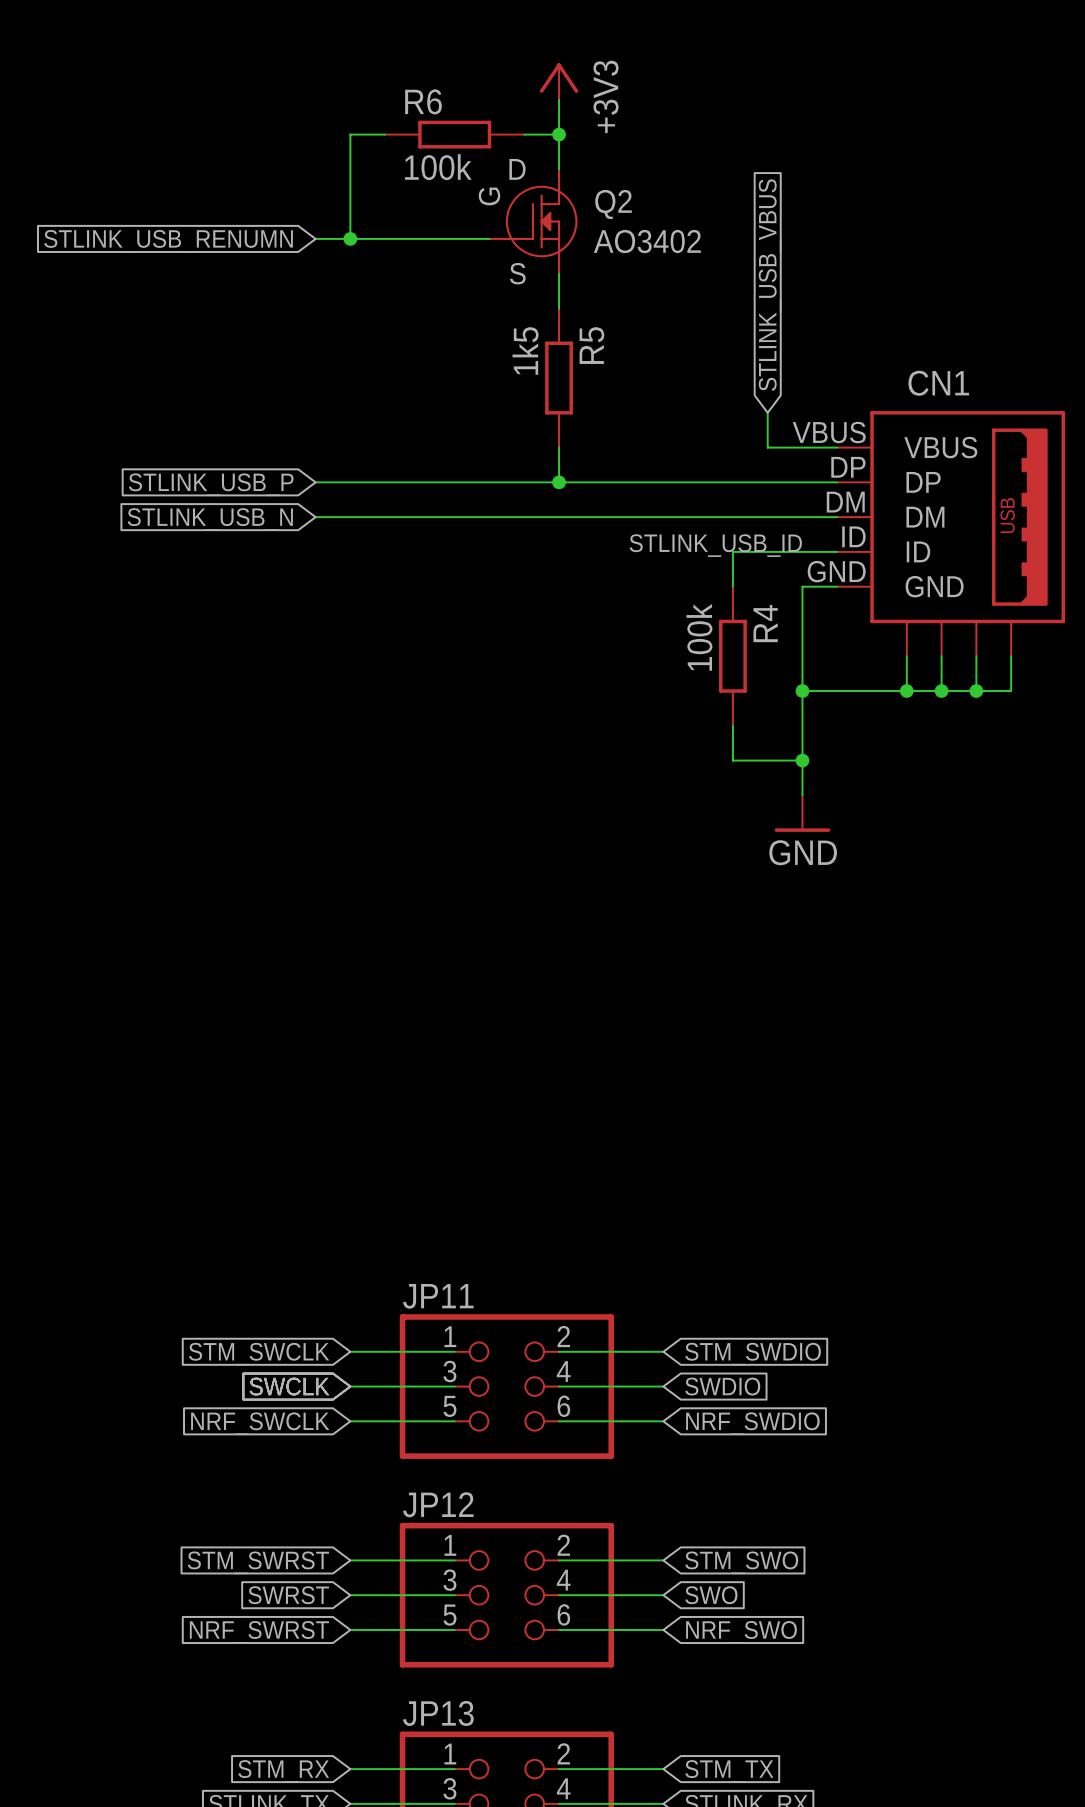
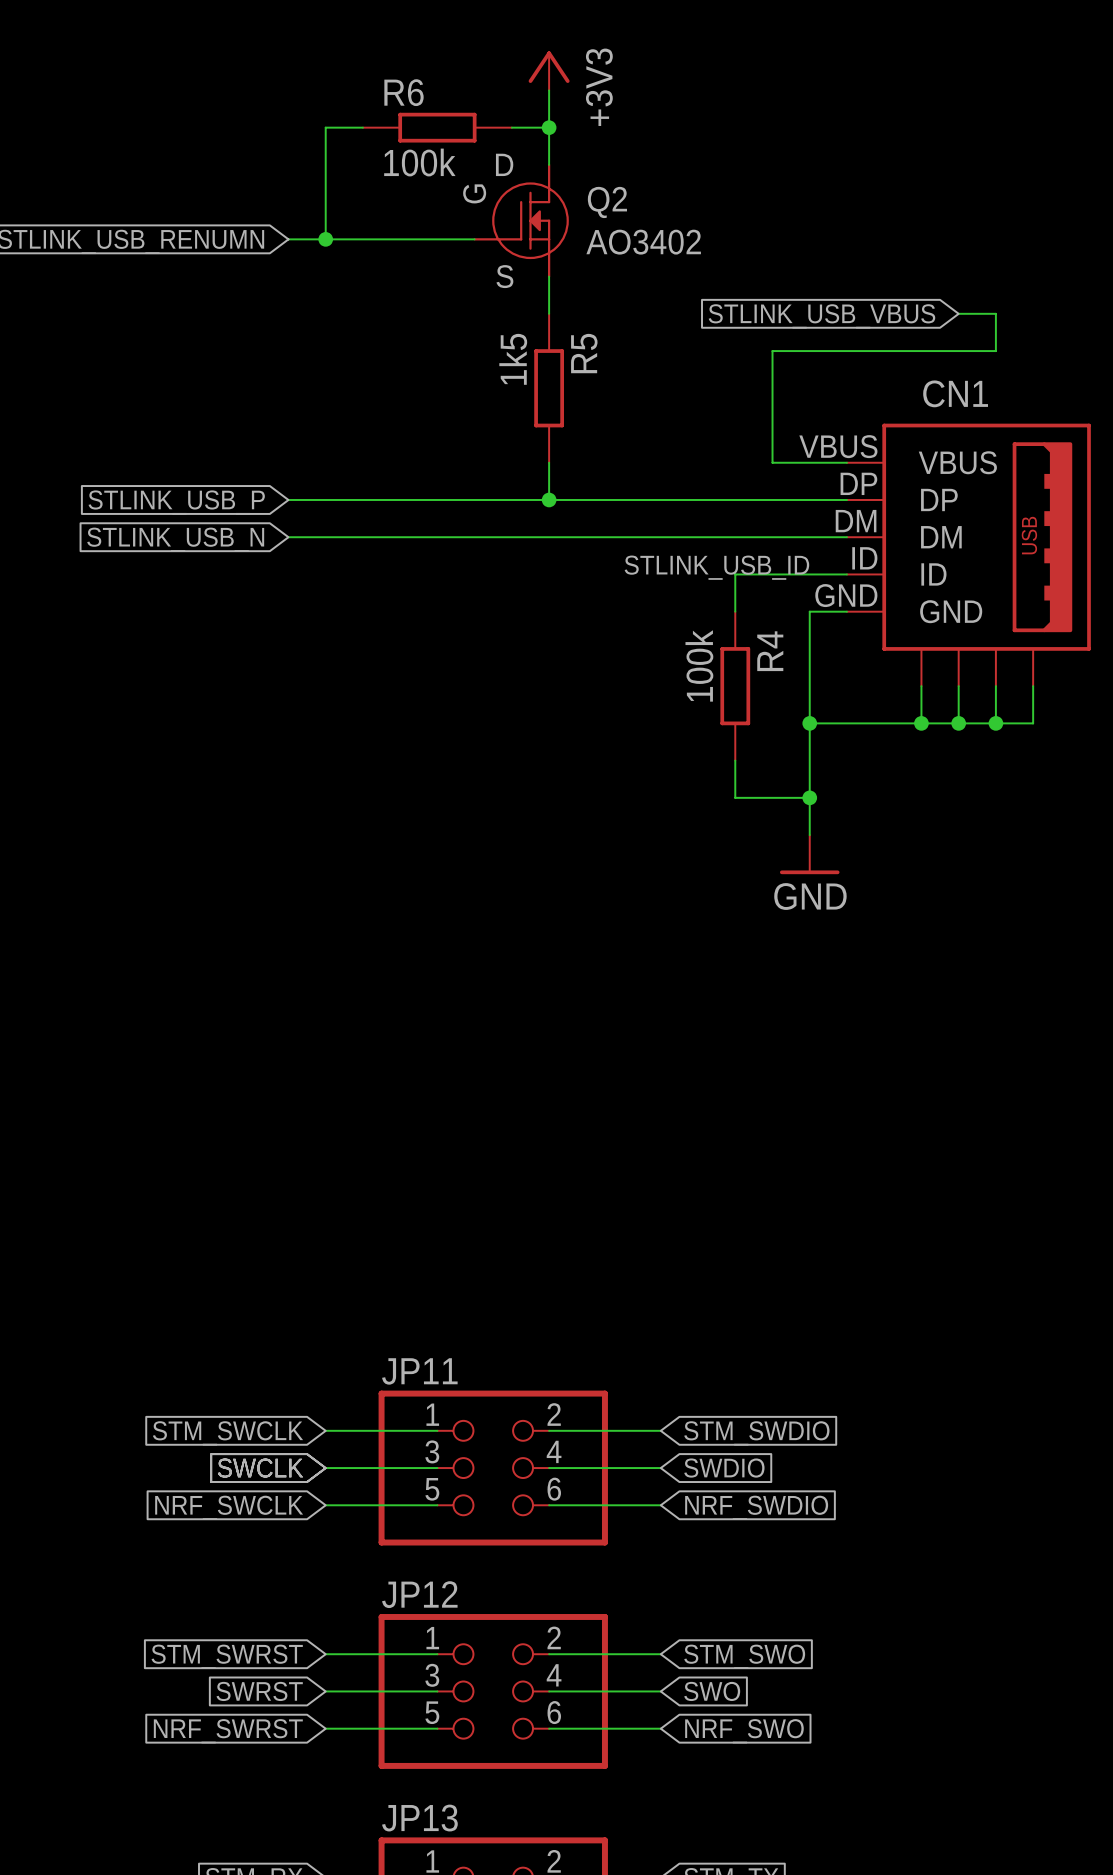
global label rotation: 0° (770, 285) -> 90° counterclockwise (821, 316)
wire: none -> (958, 313) (995, 313) (995, 351) (772, 351) (772, 425)

